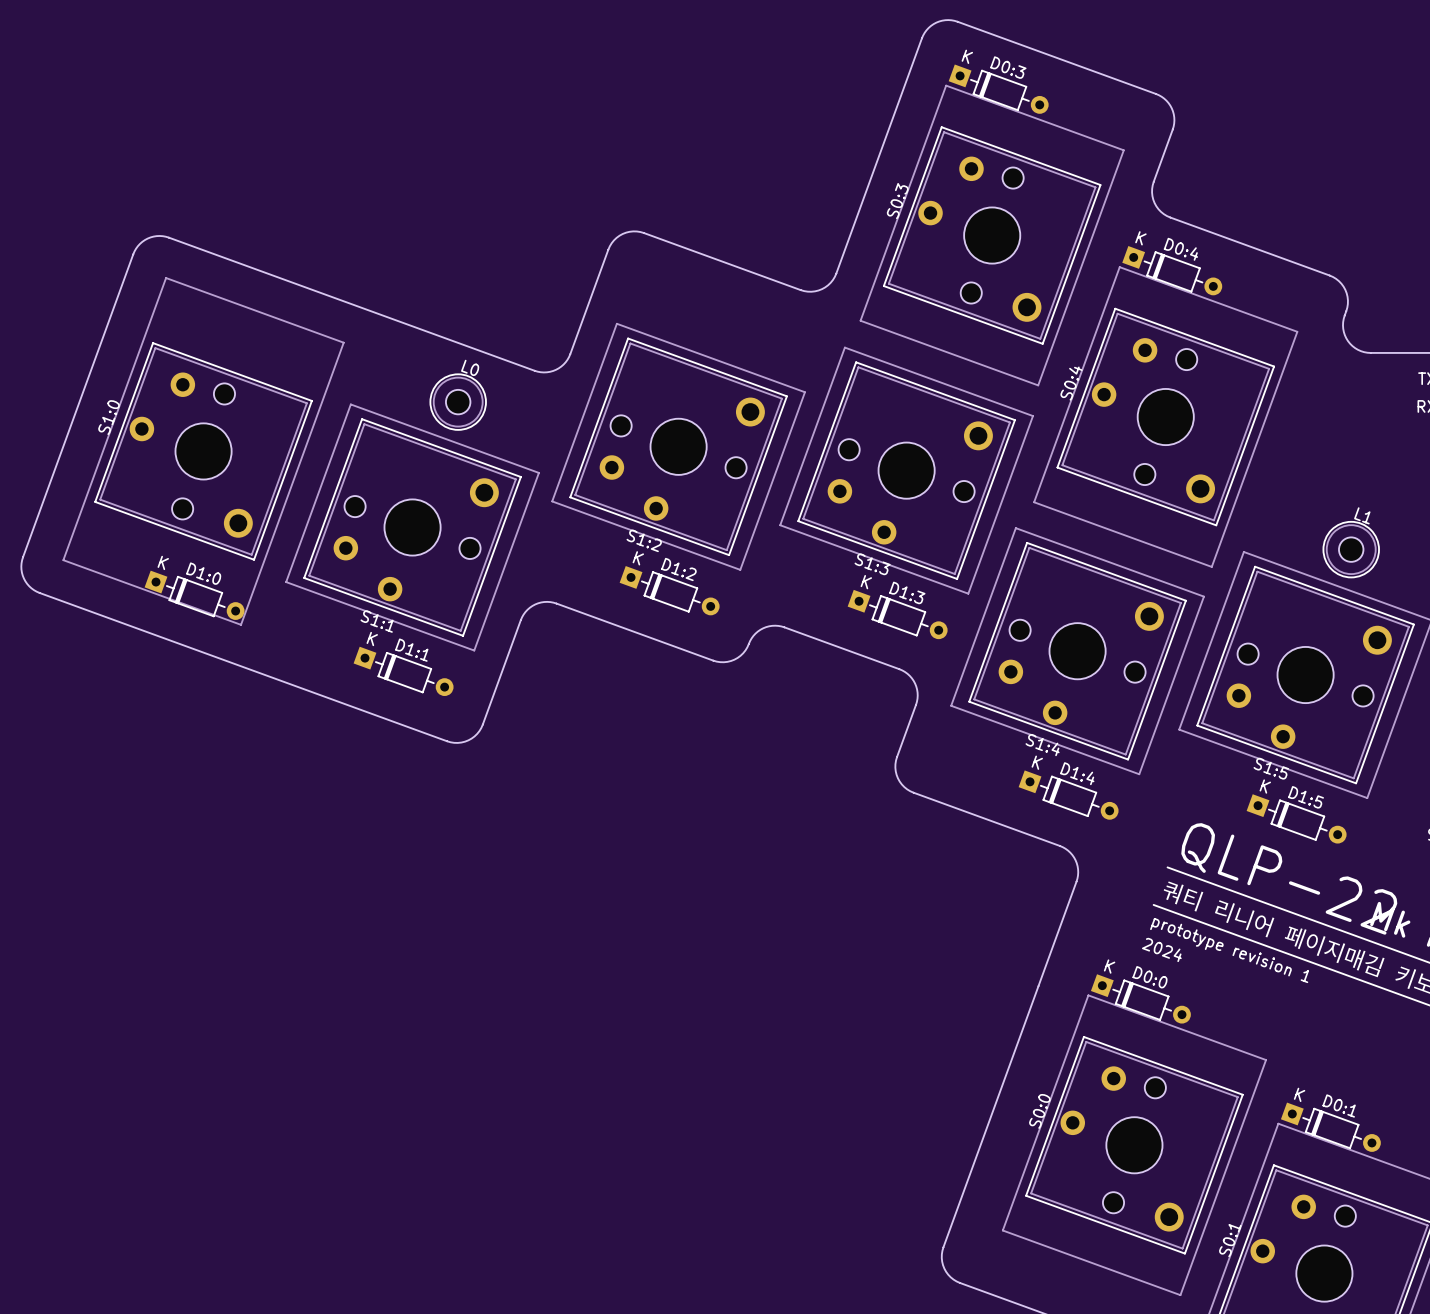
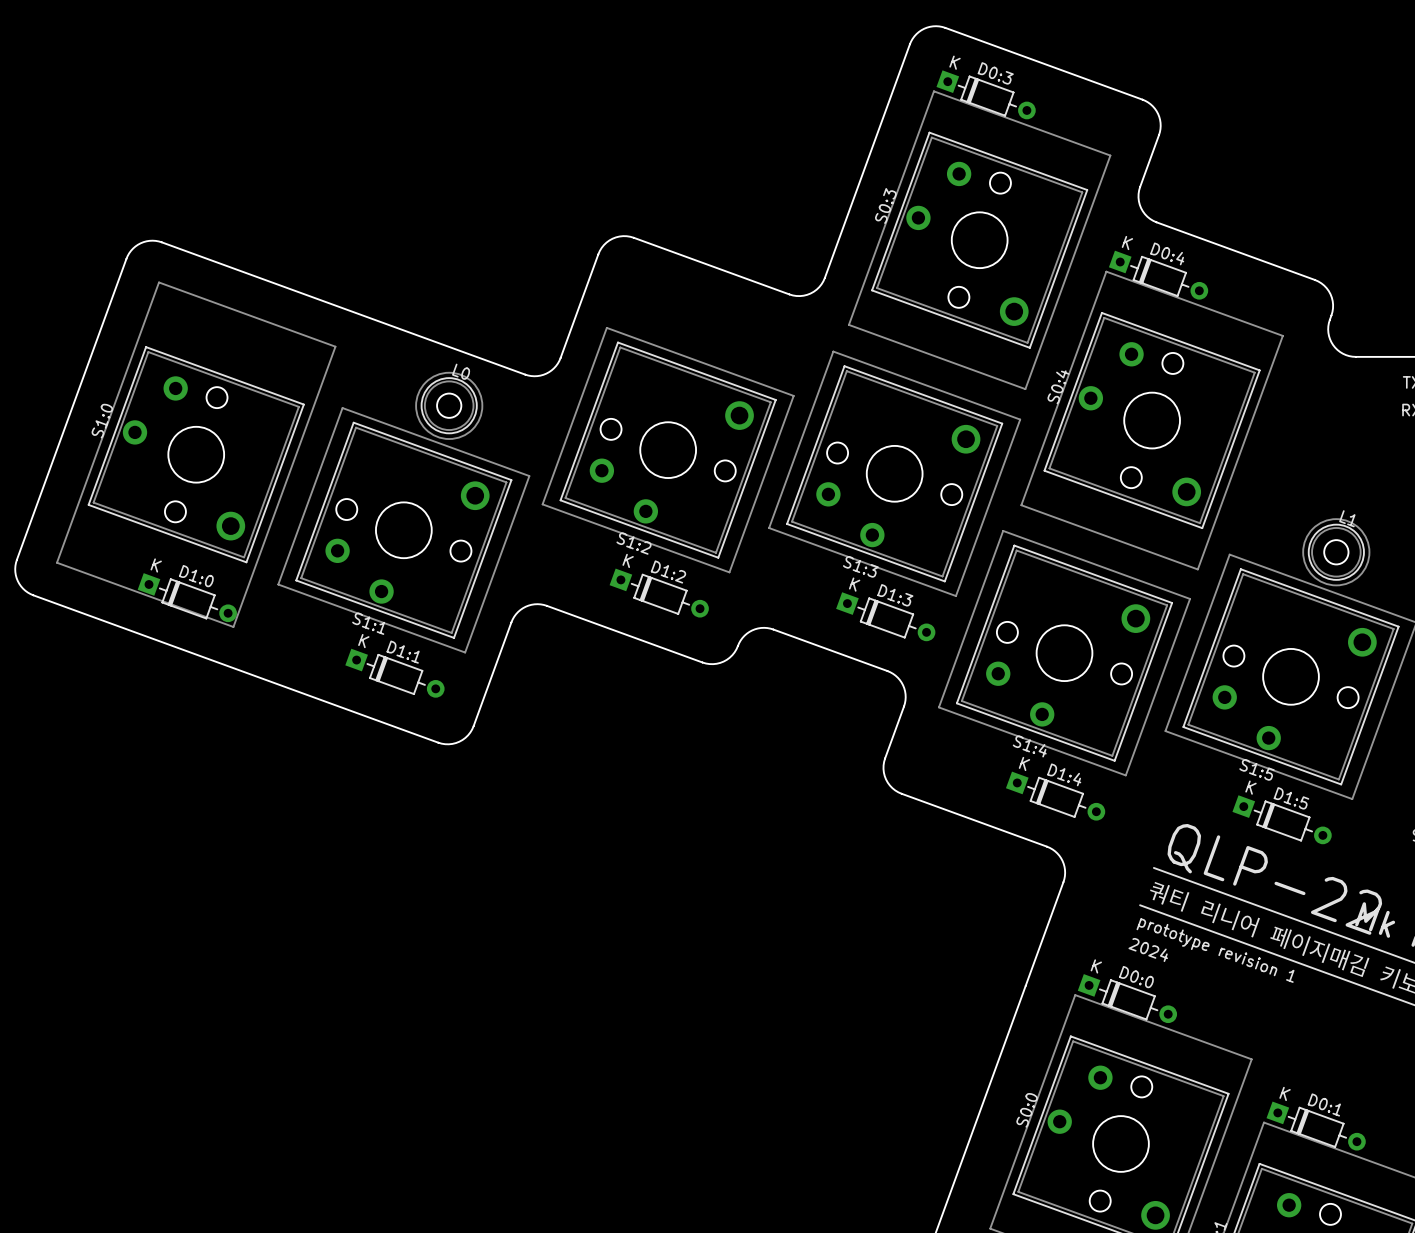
drawing: none -> [415, 371, 484, 440]
drawing: none -> [1302, 518, 1371, 587]

